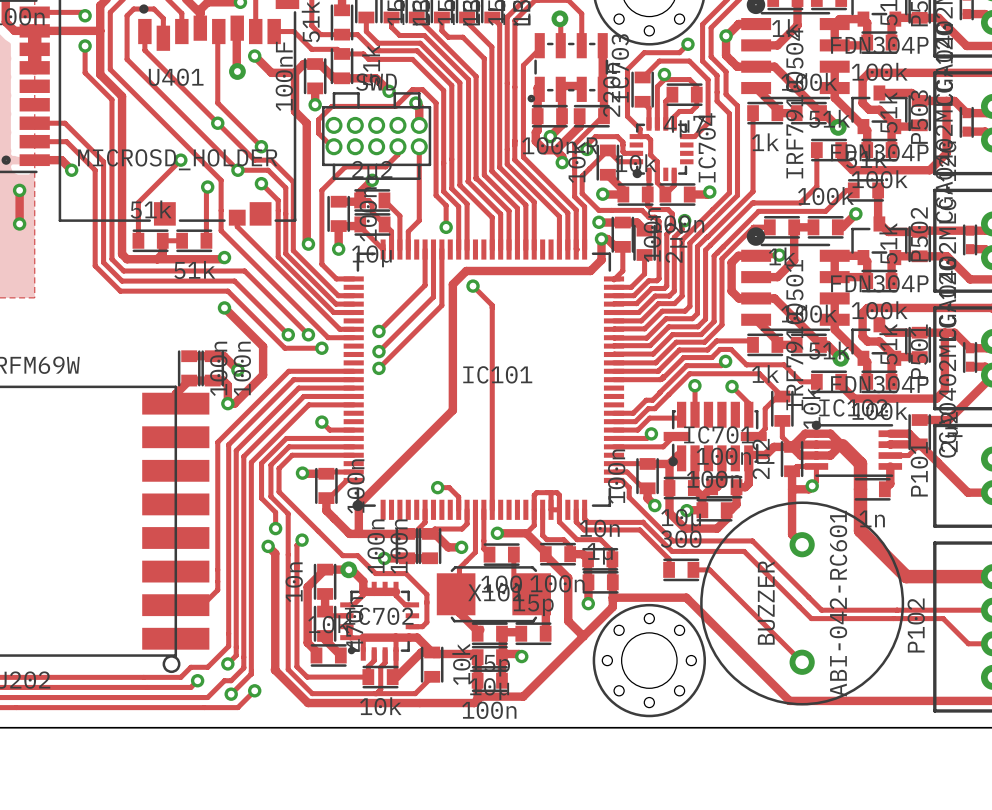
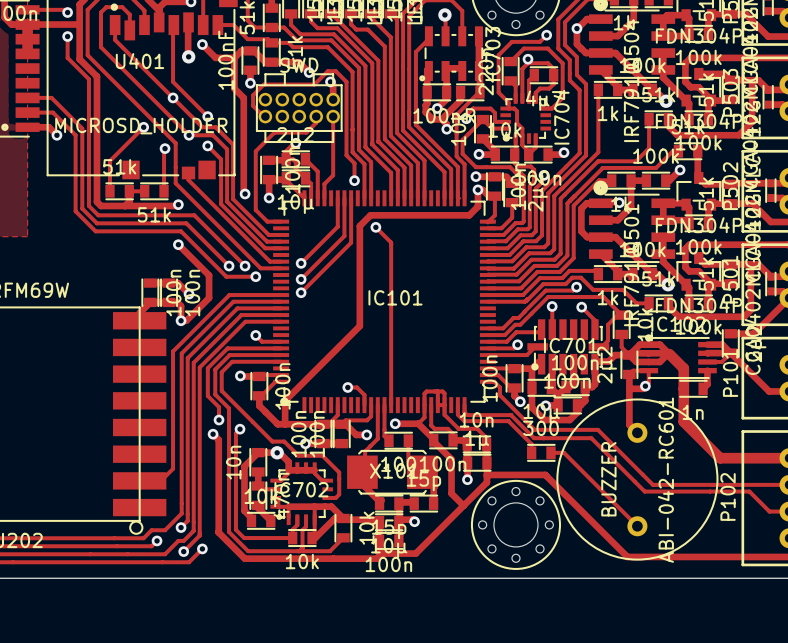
track: (19, 190) (19, 223) -> none
via: (19, 190) -> none
via: (19, 223) -> none

